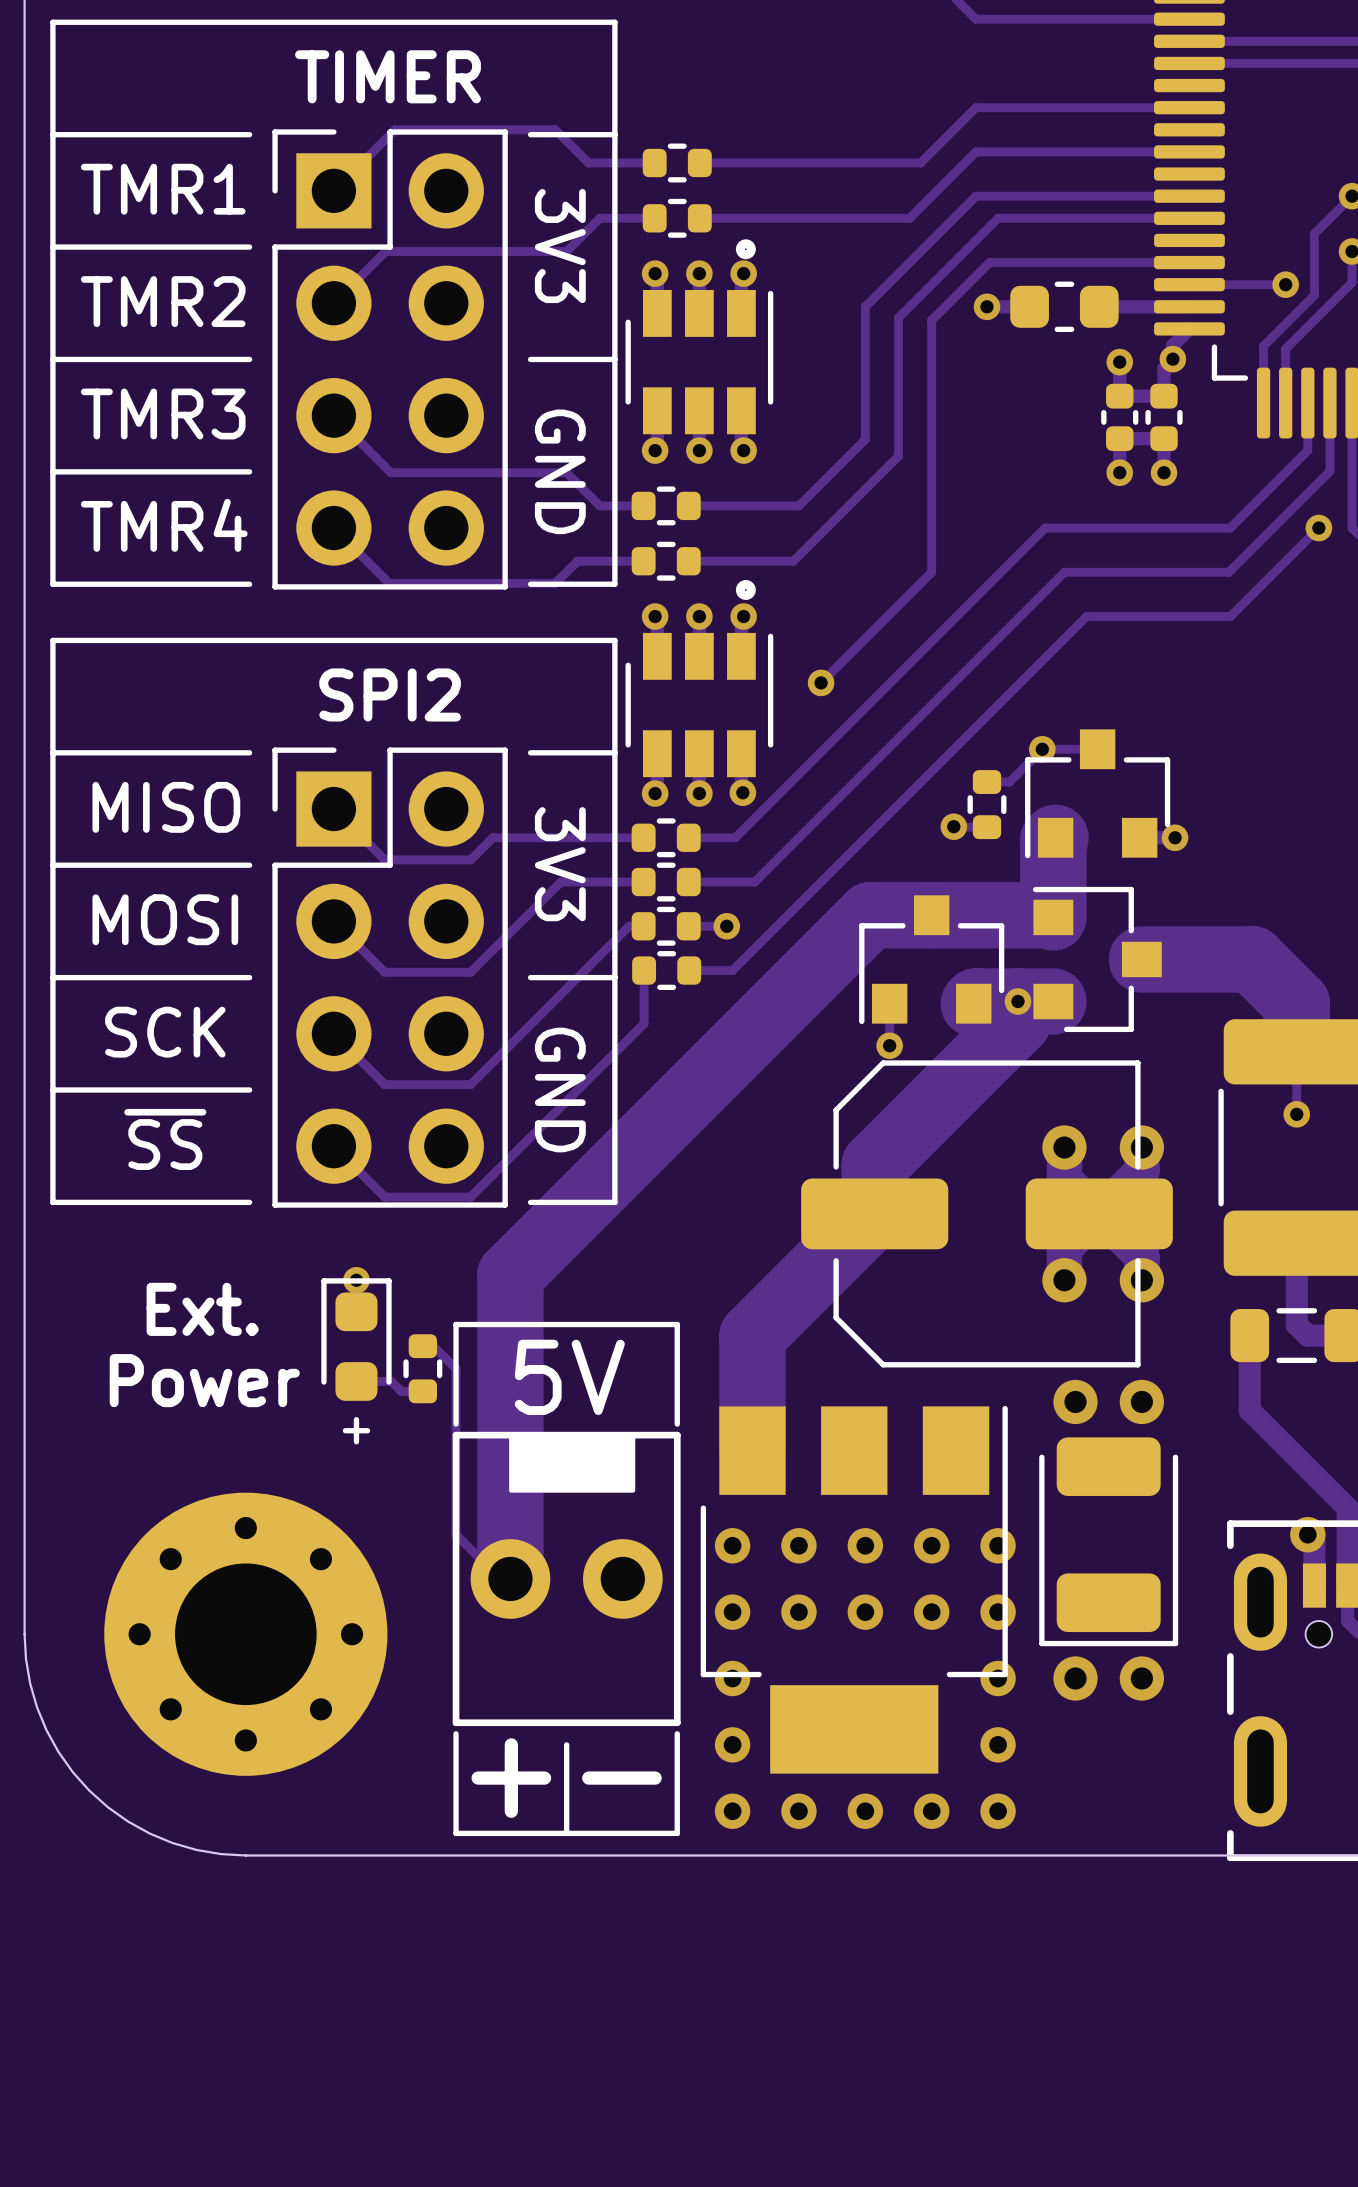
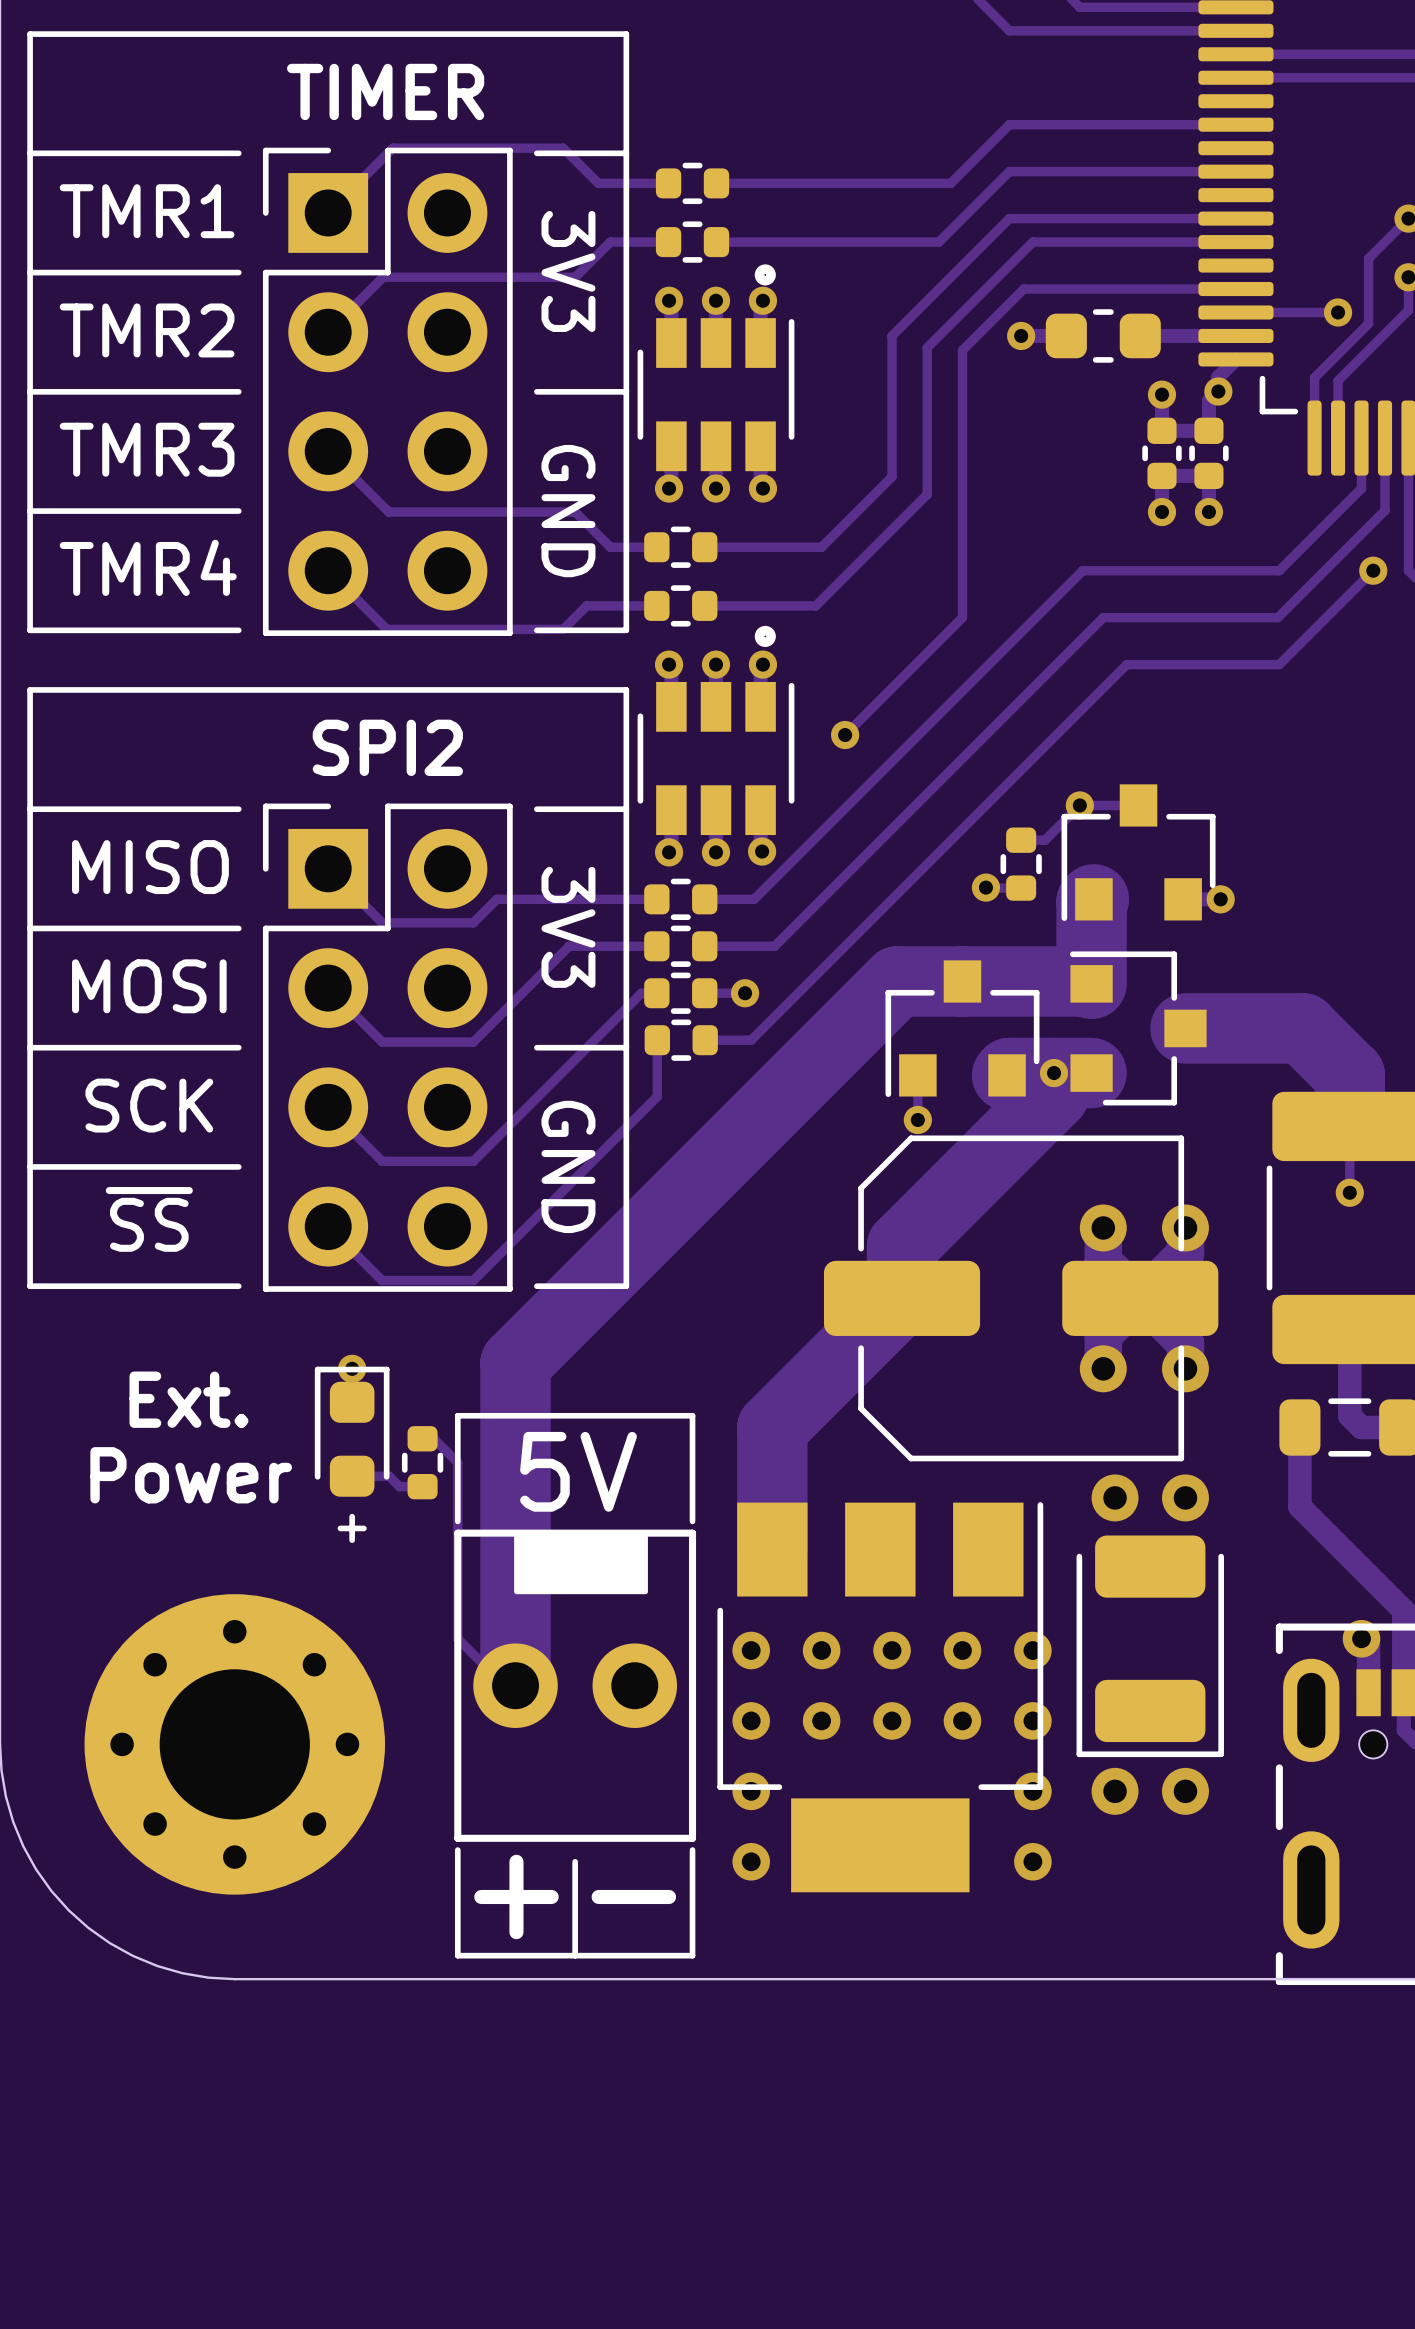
via: (732, 1811) -> none
via: (798, 1811) -> none
via: (865, 1811) -> none
via: (931, 1811) -> none
via: (998, 1811) -> none

